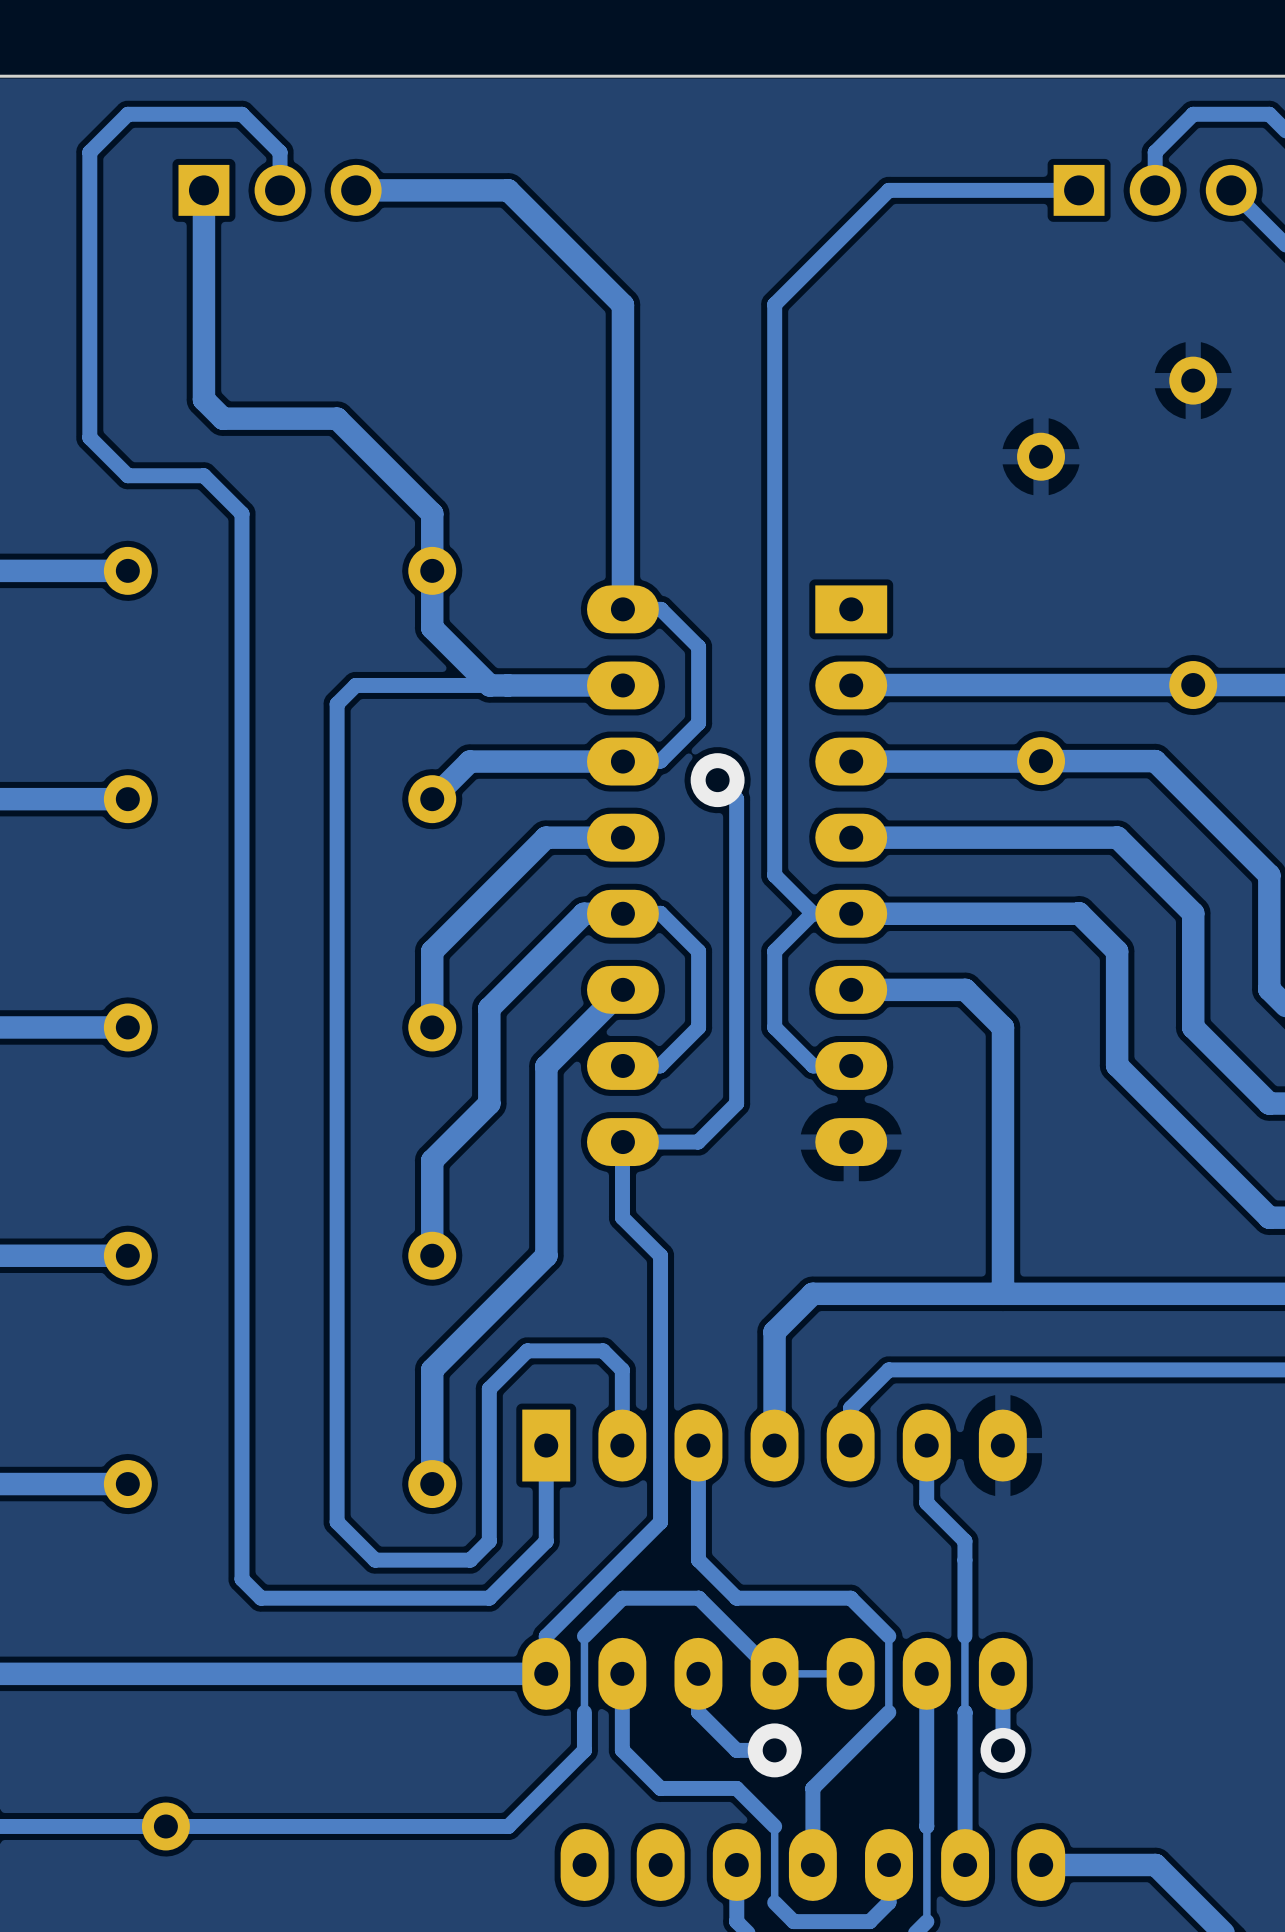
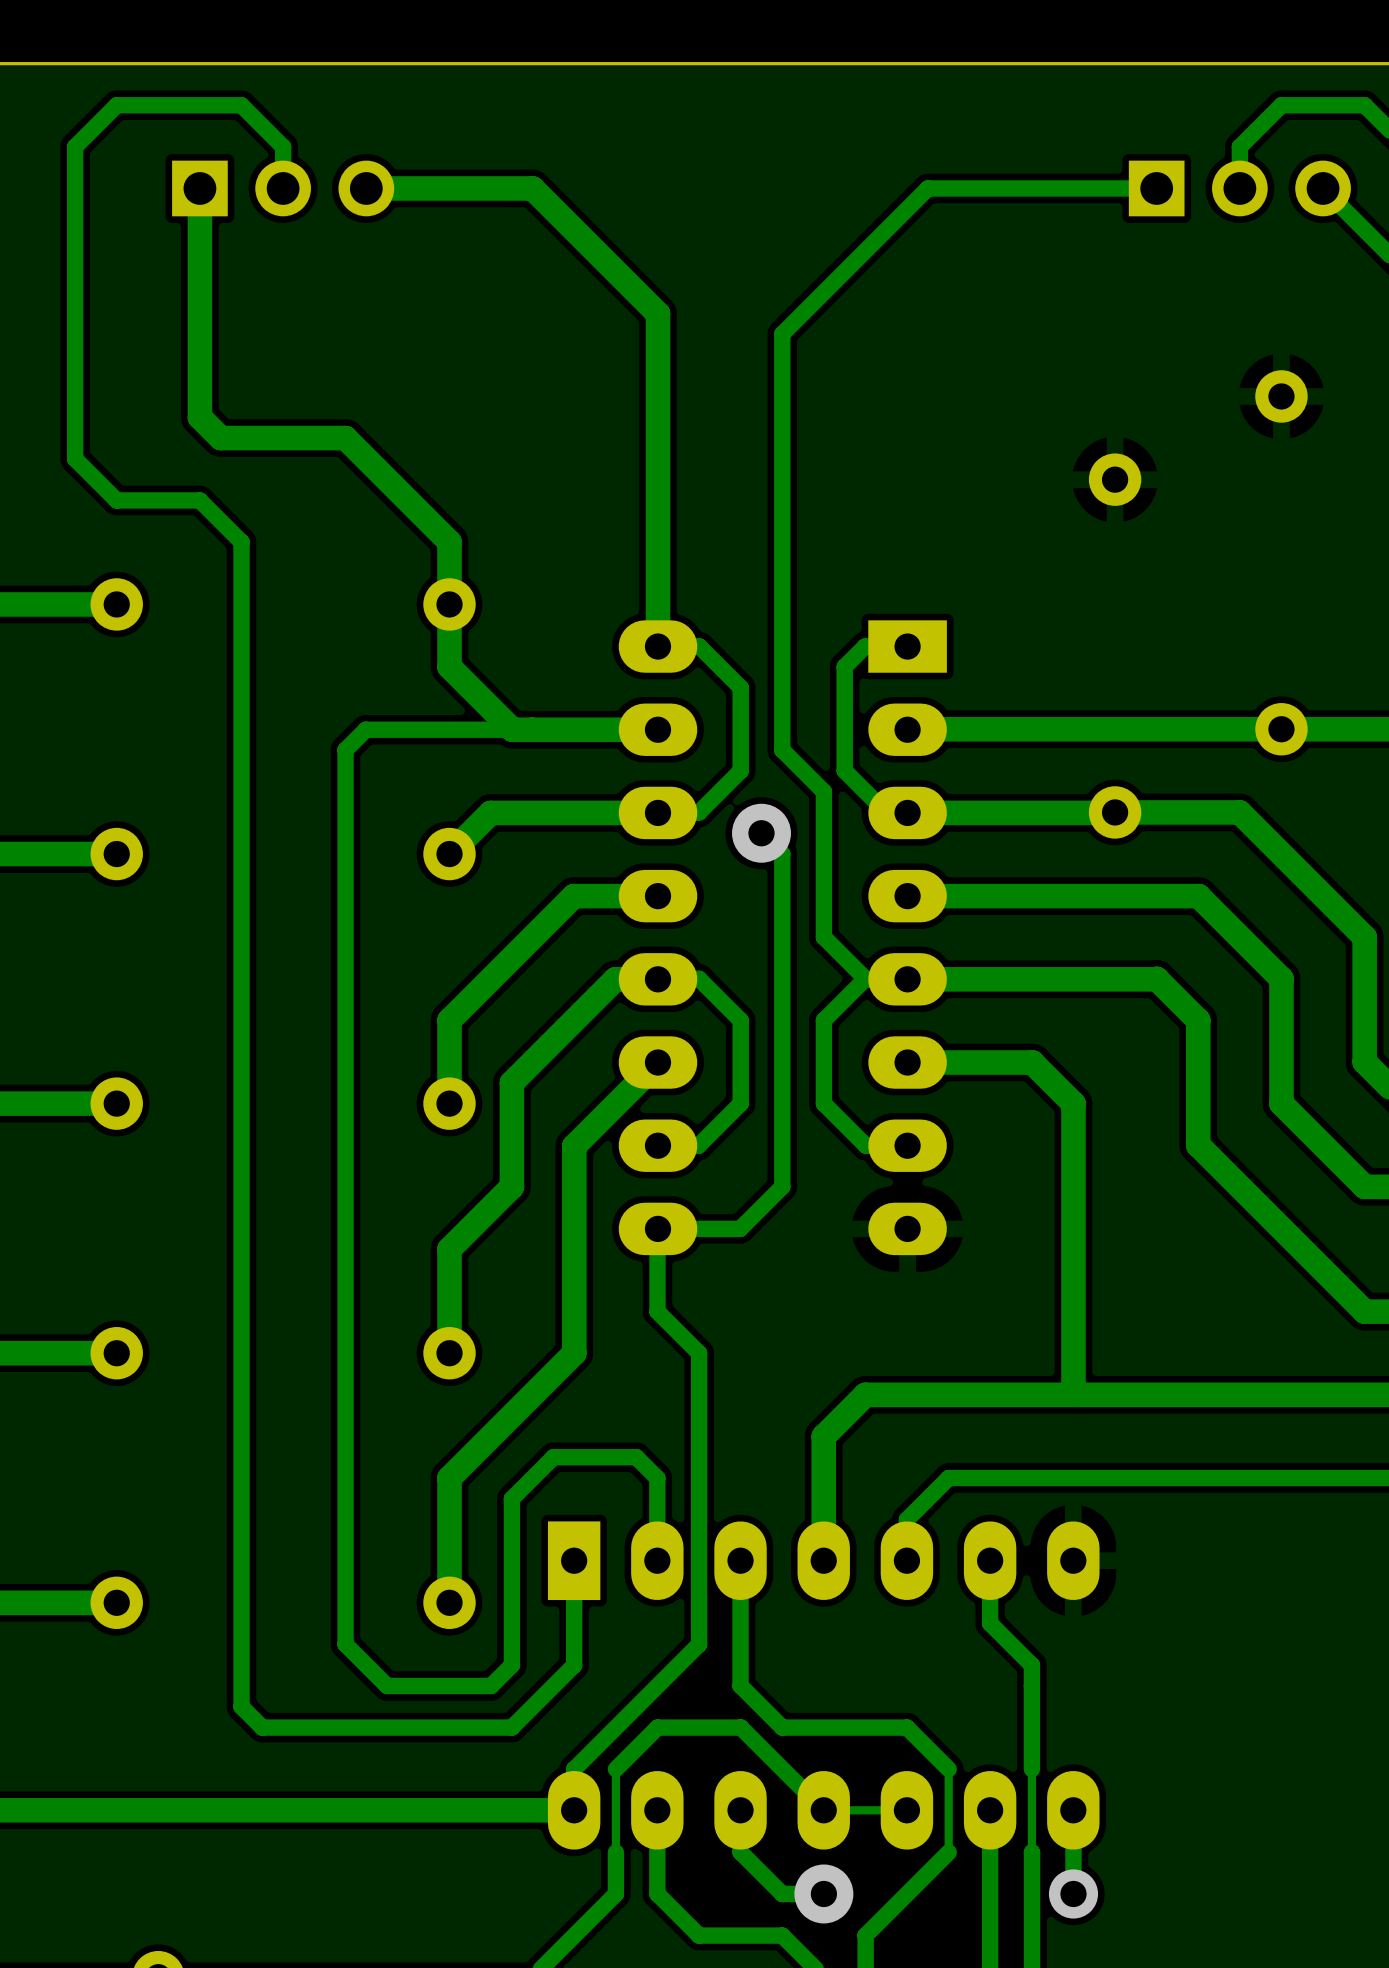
bottom track: (888, 190) (774, 304) (774, 742) -> (948, 188) (927, 188) (782, 334) (782, 750) (823, 791)
bottom track: none -> (907, 646) (865, 646) (844, 666) (844, 770) (886, 812) (907, 812)

